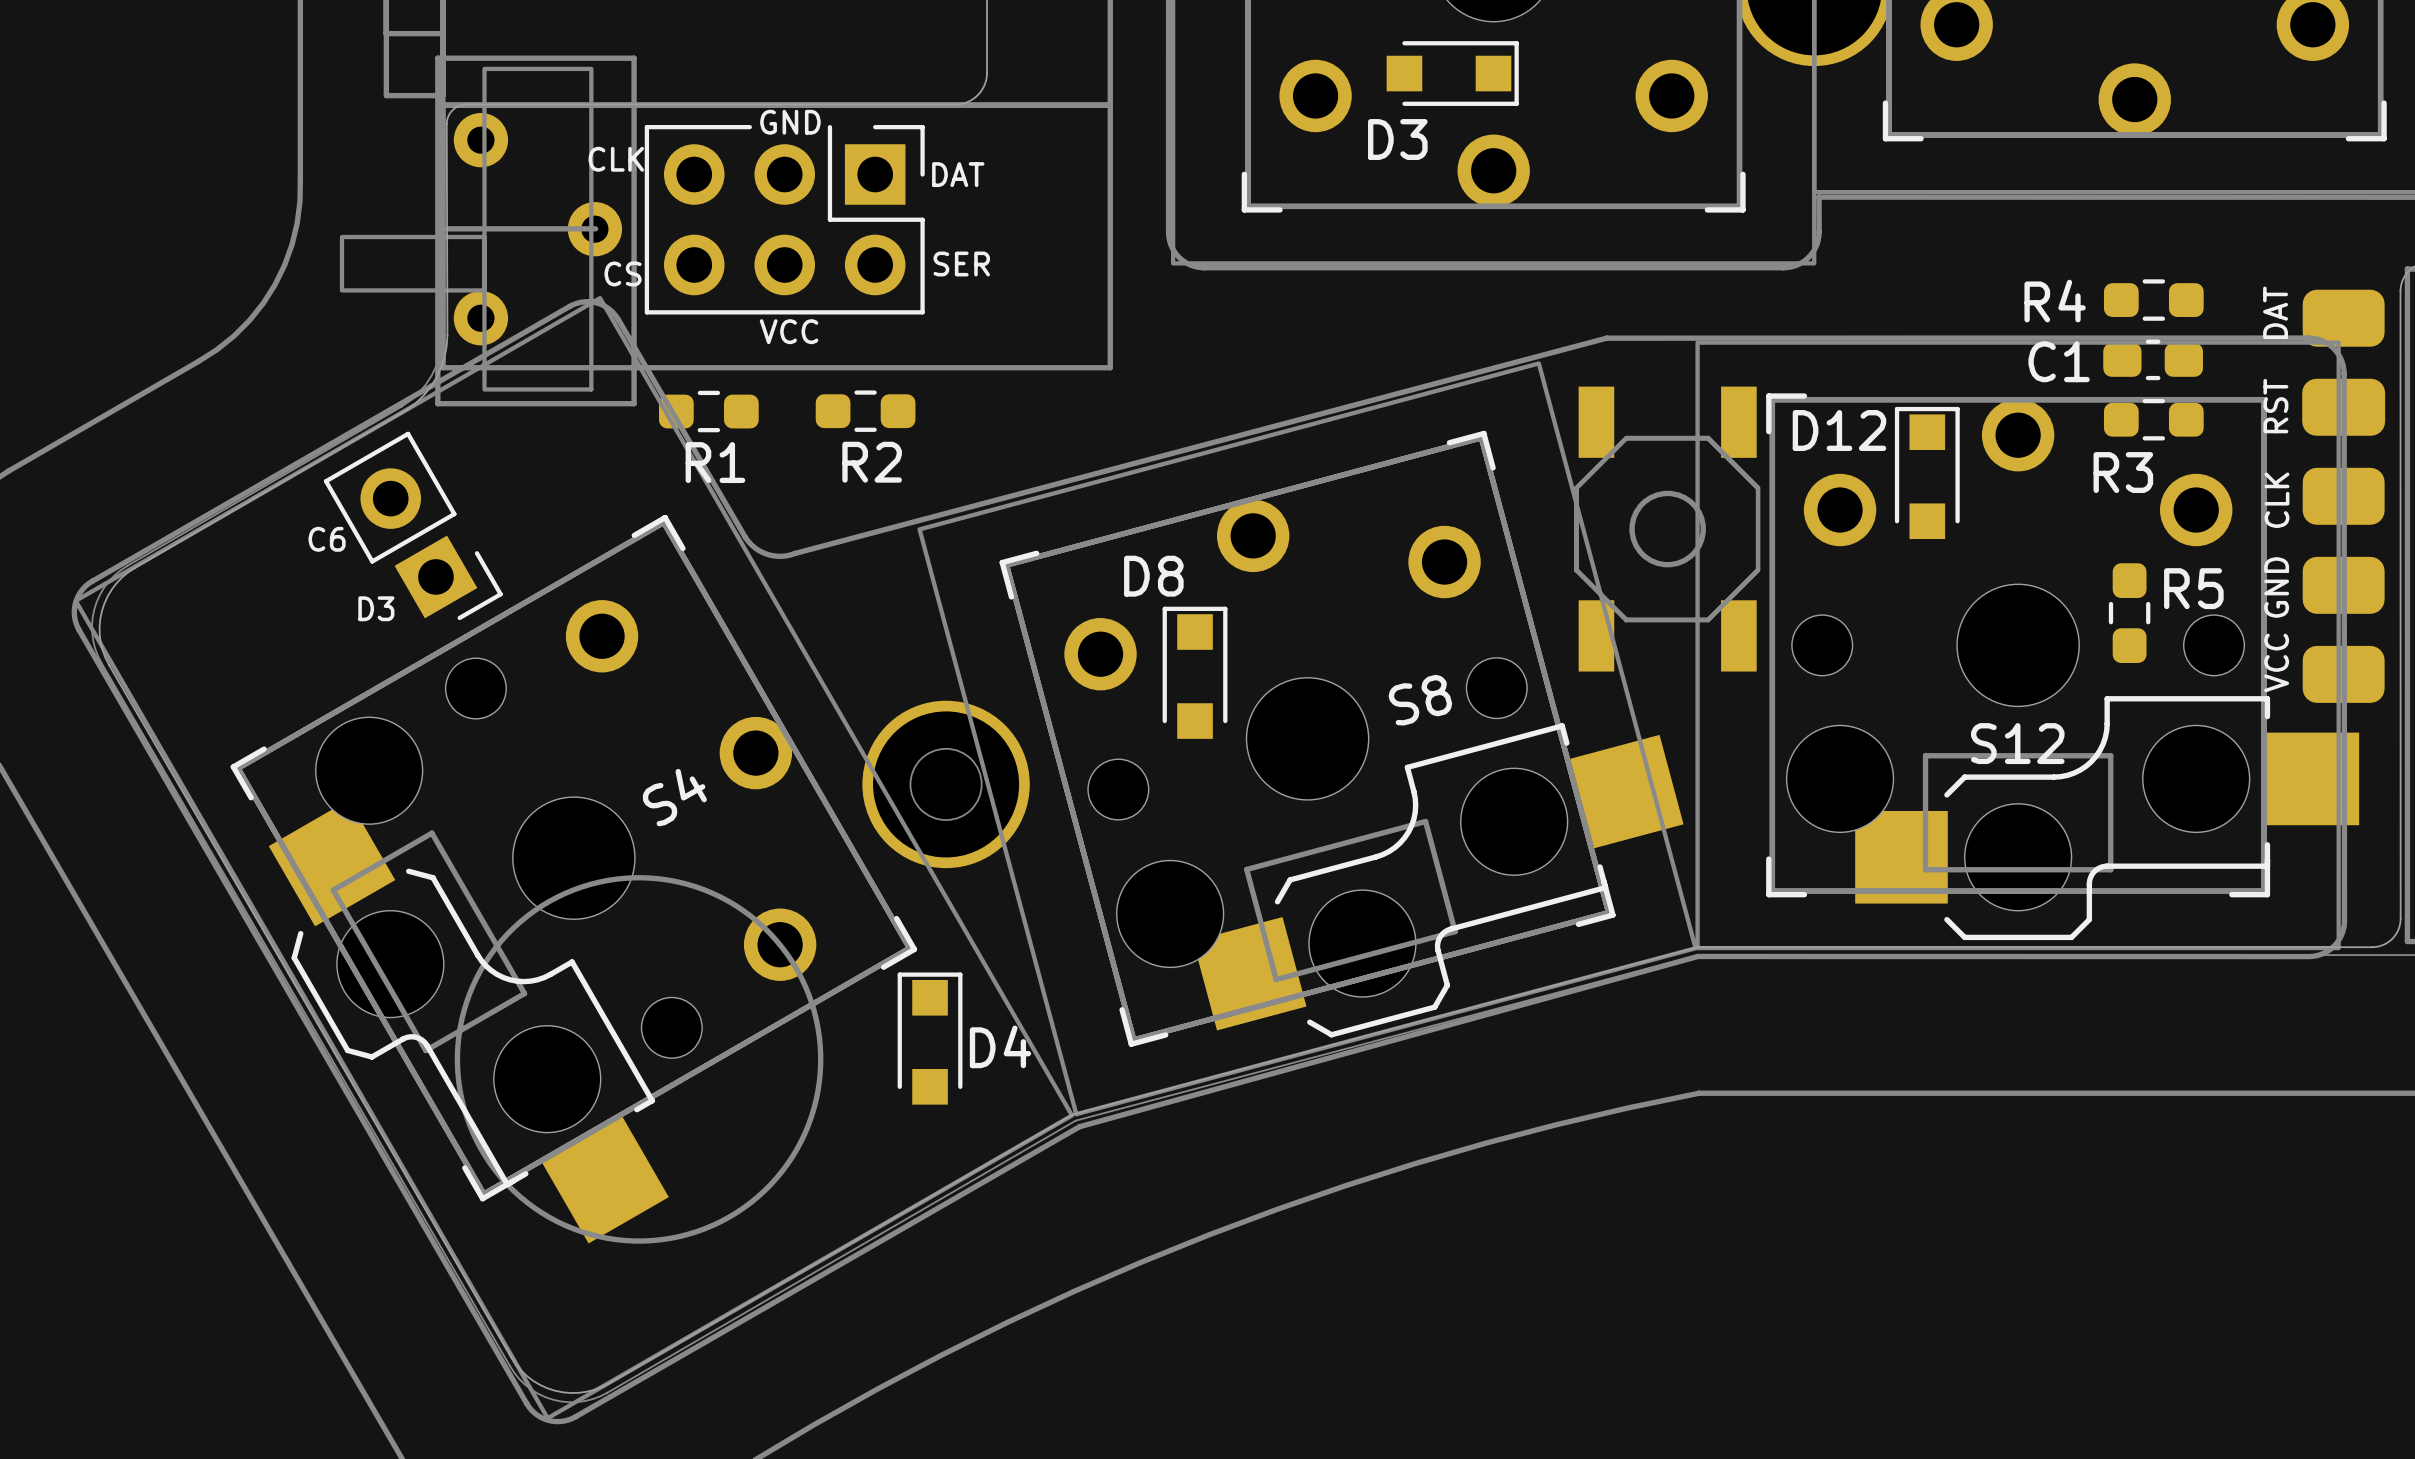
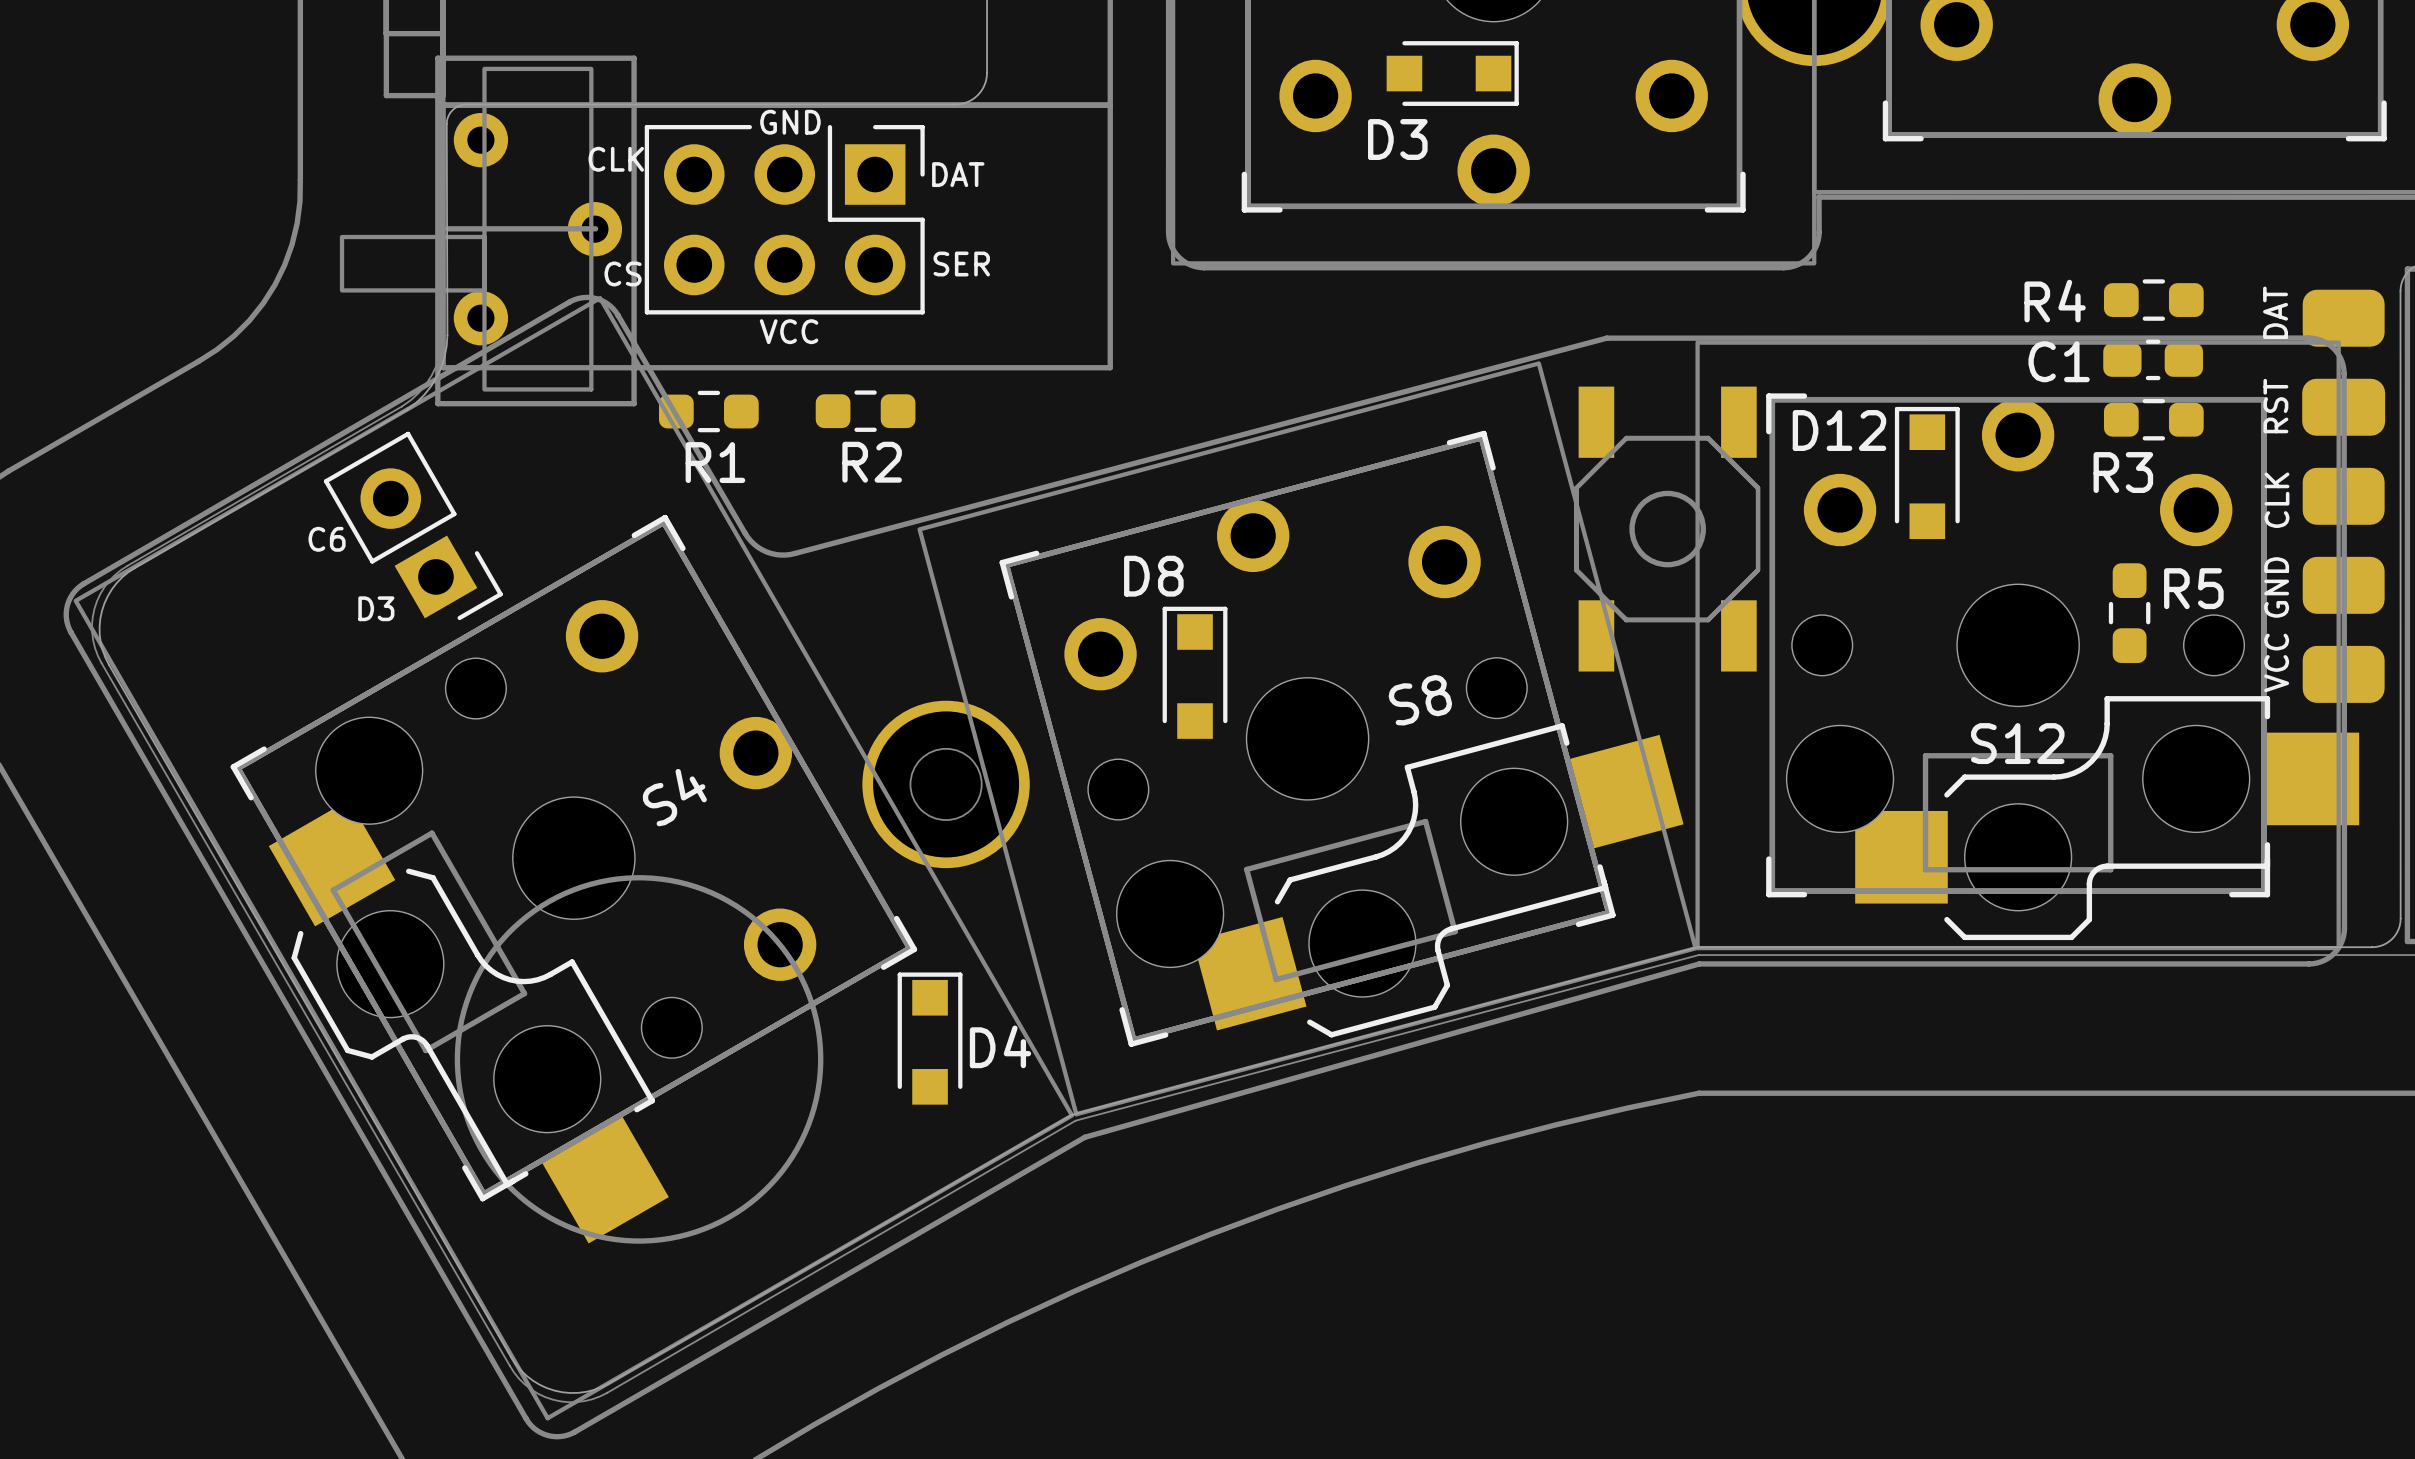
line: (795, 553) (781, 556) (771, 555) (758, 550) (748, 541) (616, 316) (600, 304) (584, 301) (569, 306) (92, 581) (82, 588) (75, 603) (74, 614) (79, 630) (526, 1403) (534, 1412) (548, 1420) (560, 1421) (575, 1416) (1079, 1126) (1697, 956) (2308, 956) (2324, 953) (2334, 946) (2340, 936) (2344, 920) -> (795, 553) (780, 555) (771, 553) (757, 547) (750, 540) (615, 311) (603, 301) (584, 297) (569, 302) (84, 583) (72, 594) (67, 605) (66, 617) (70, 632) (526, 1418) (537, 1430) (547, 1435) (563, 1436) (574, 1431) (1084, 1137) (1699, 963) (2312, 963) (2324, 960) (2336, 950) (2343, 936) (2344, 920)

